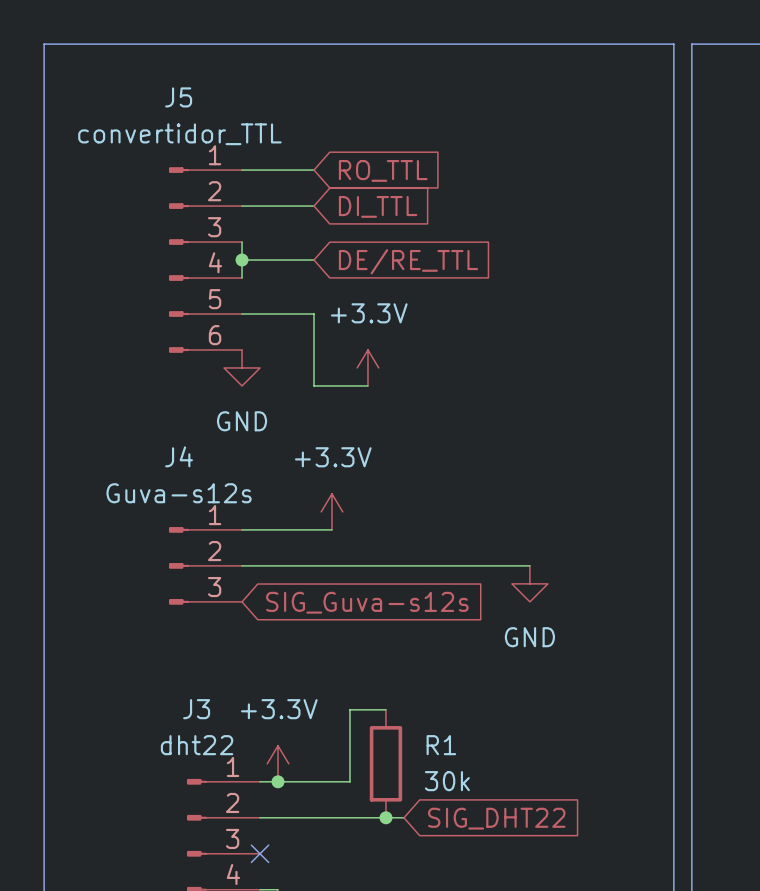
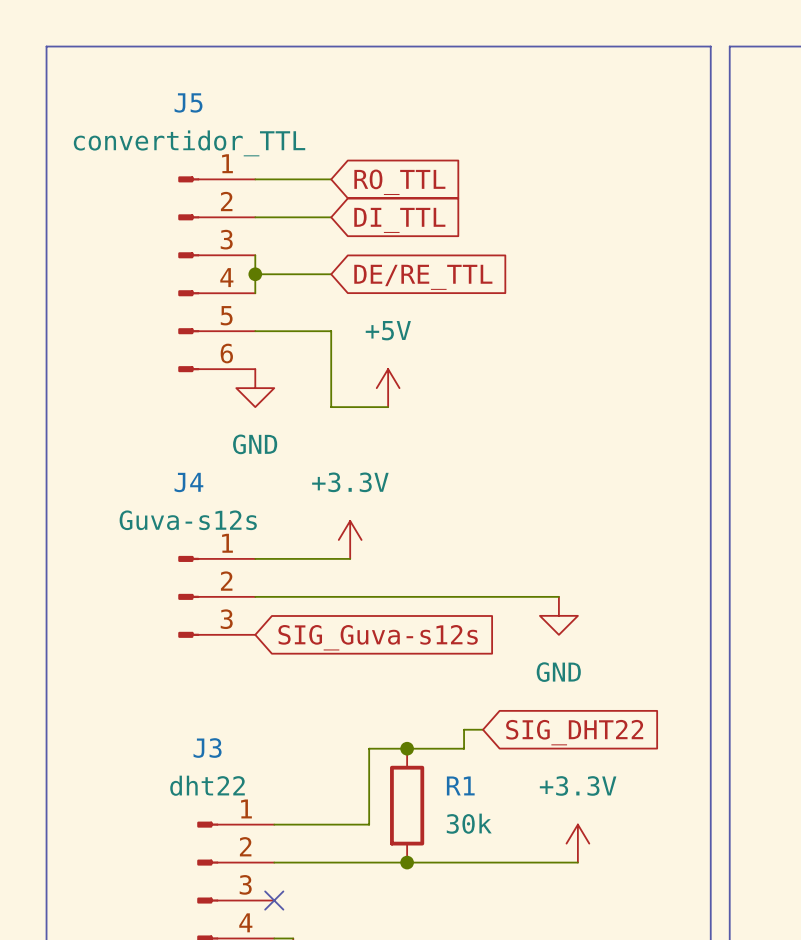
power symbol: +3.3V (367, 367) -> +5V (388, 388)
wire: none -> (483, 729) (464, 729) (464, 748) (407, 748)
junction: none -> (407, 748)
power symbol position: +3.3V (278, 763) -> +3.3V (577, 843)
junction: (278, 781) -> none
wire: none -> (426, 862) (577, 862)
global label position: SIG_DHT22 (496, 818) -> SIG_DHT22 (574, 732)

